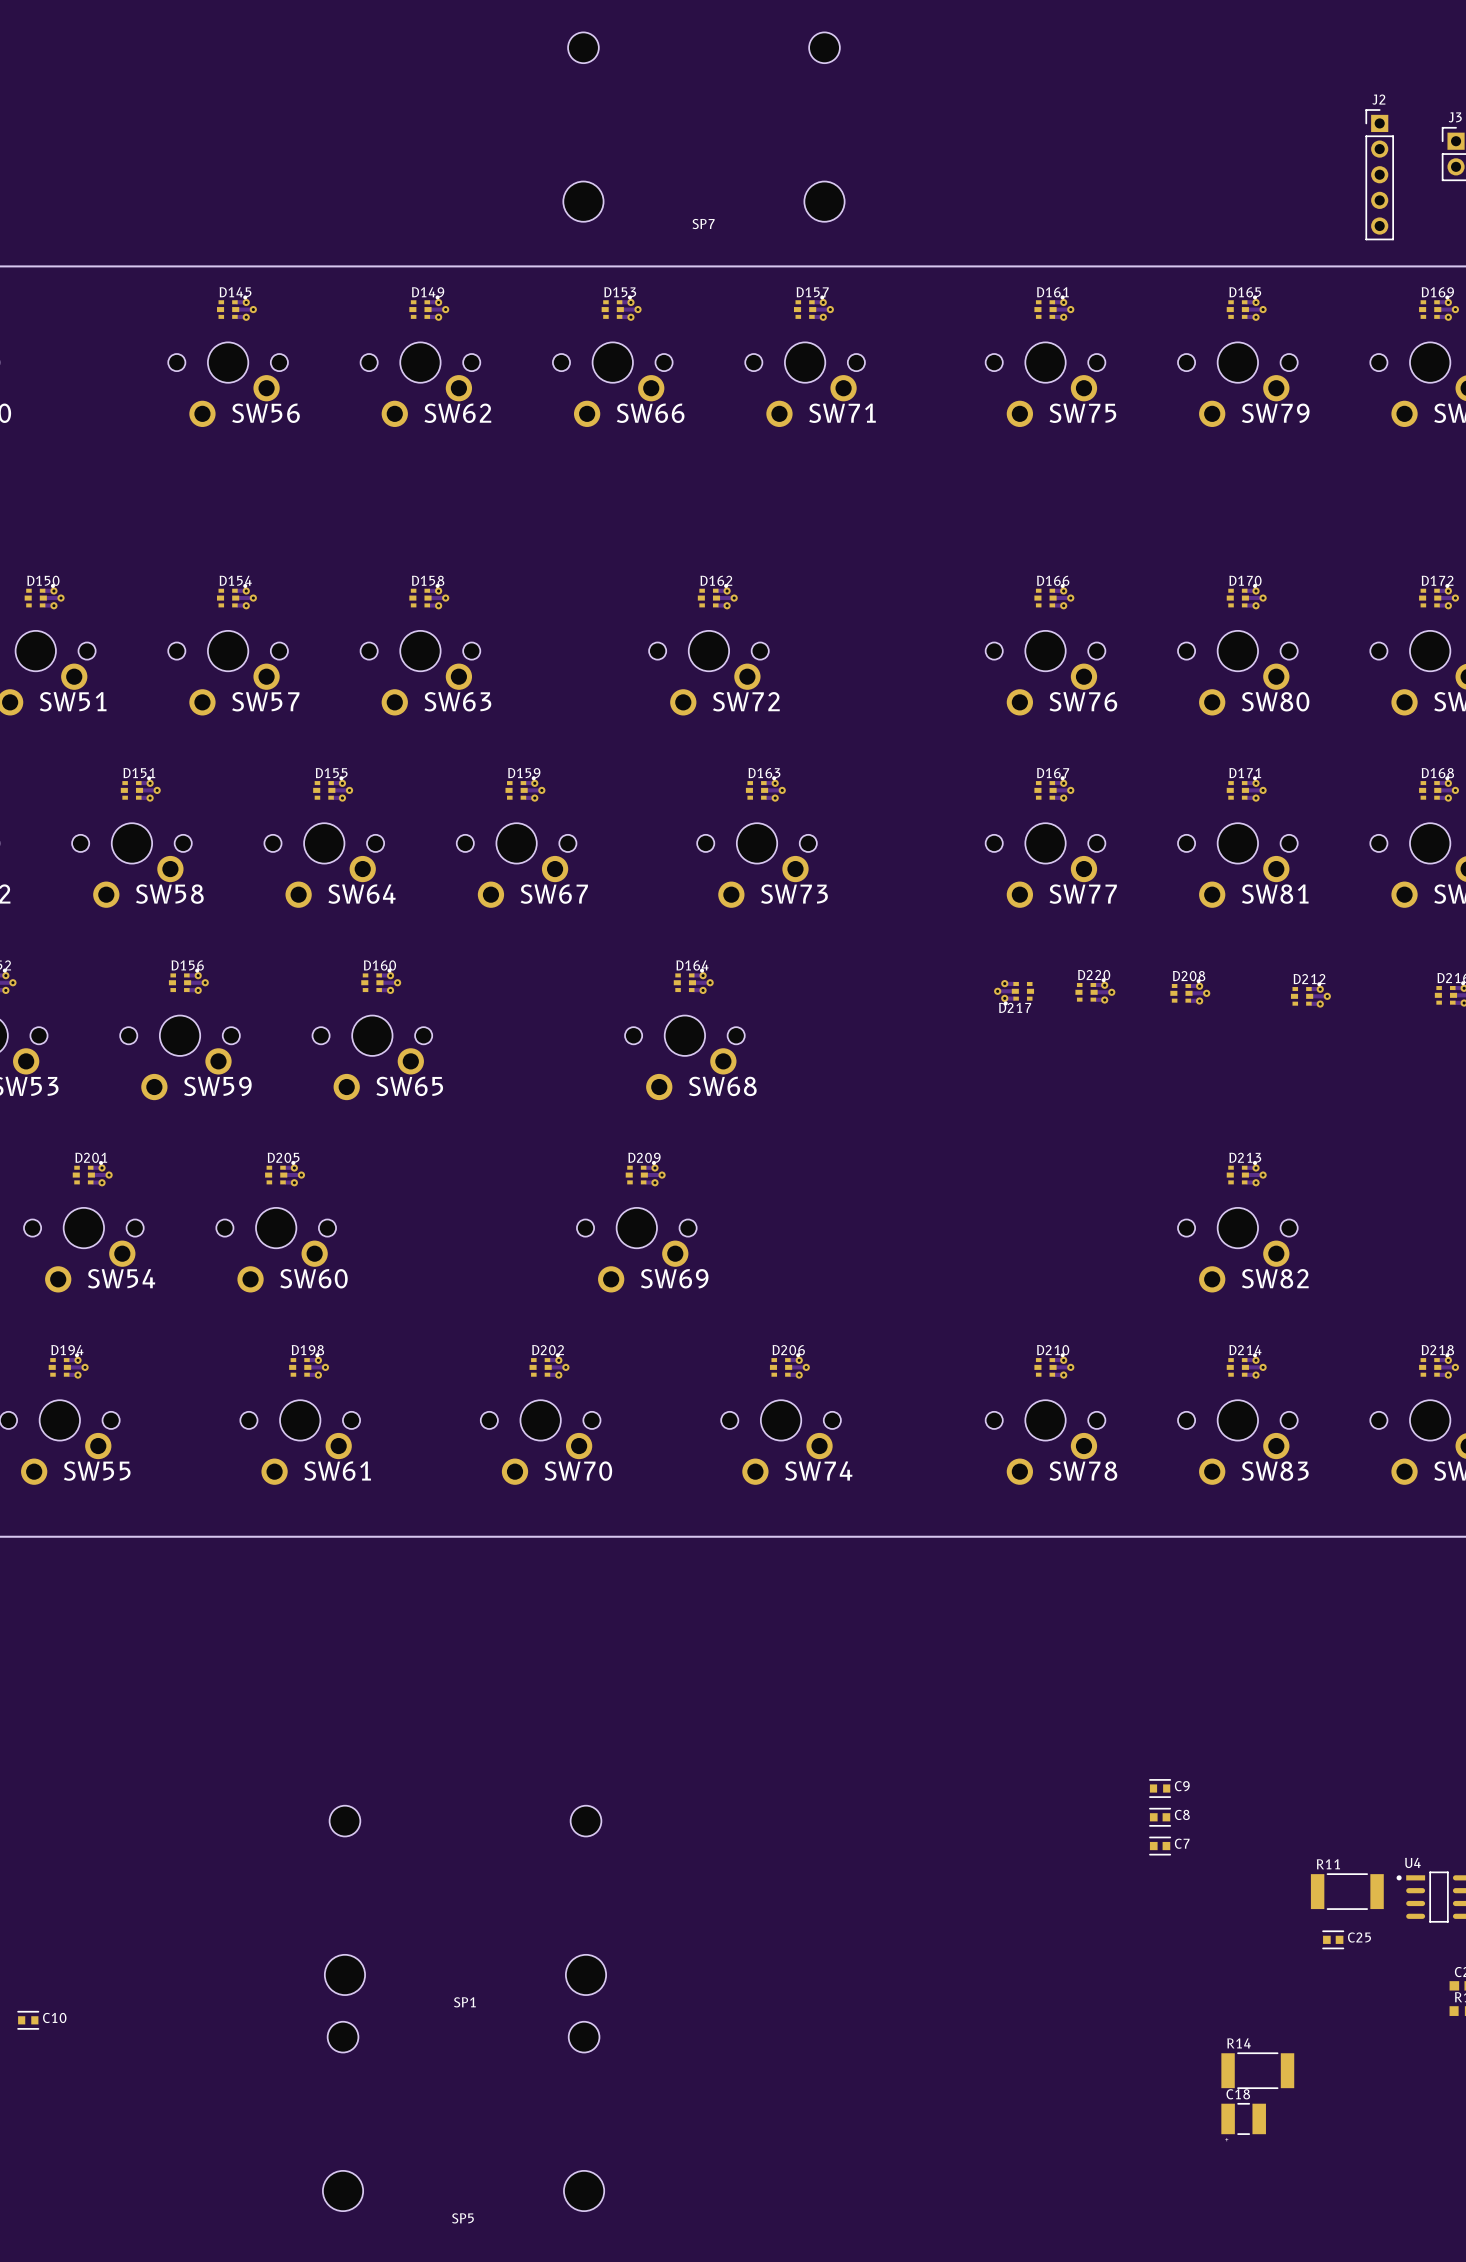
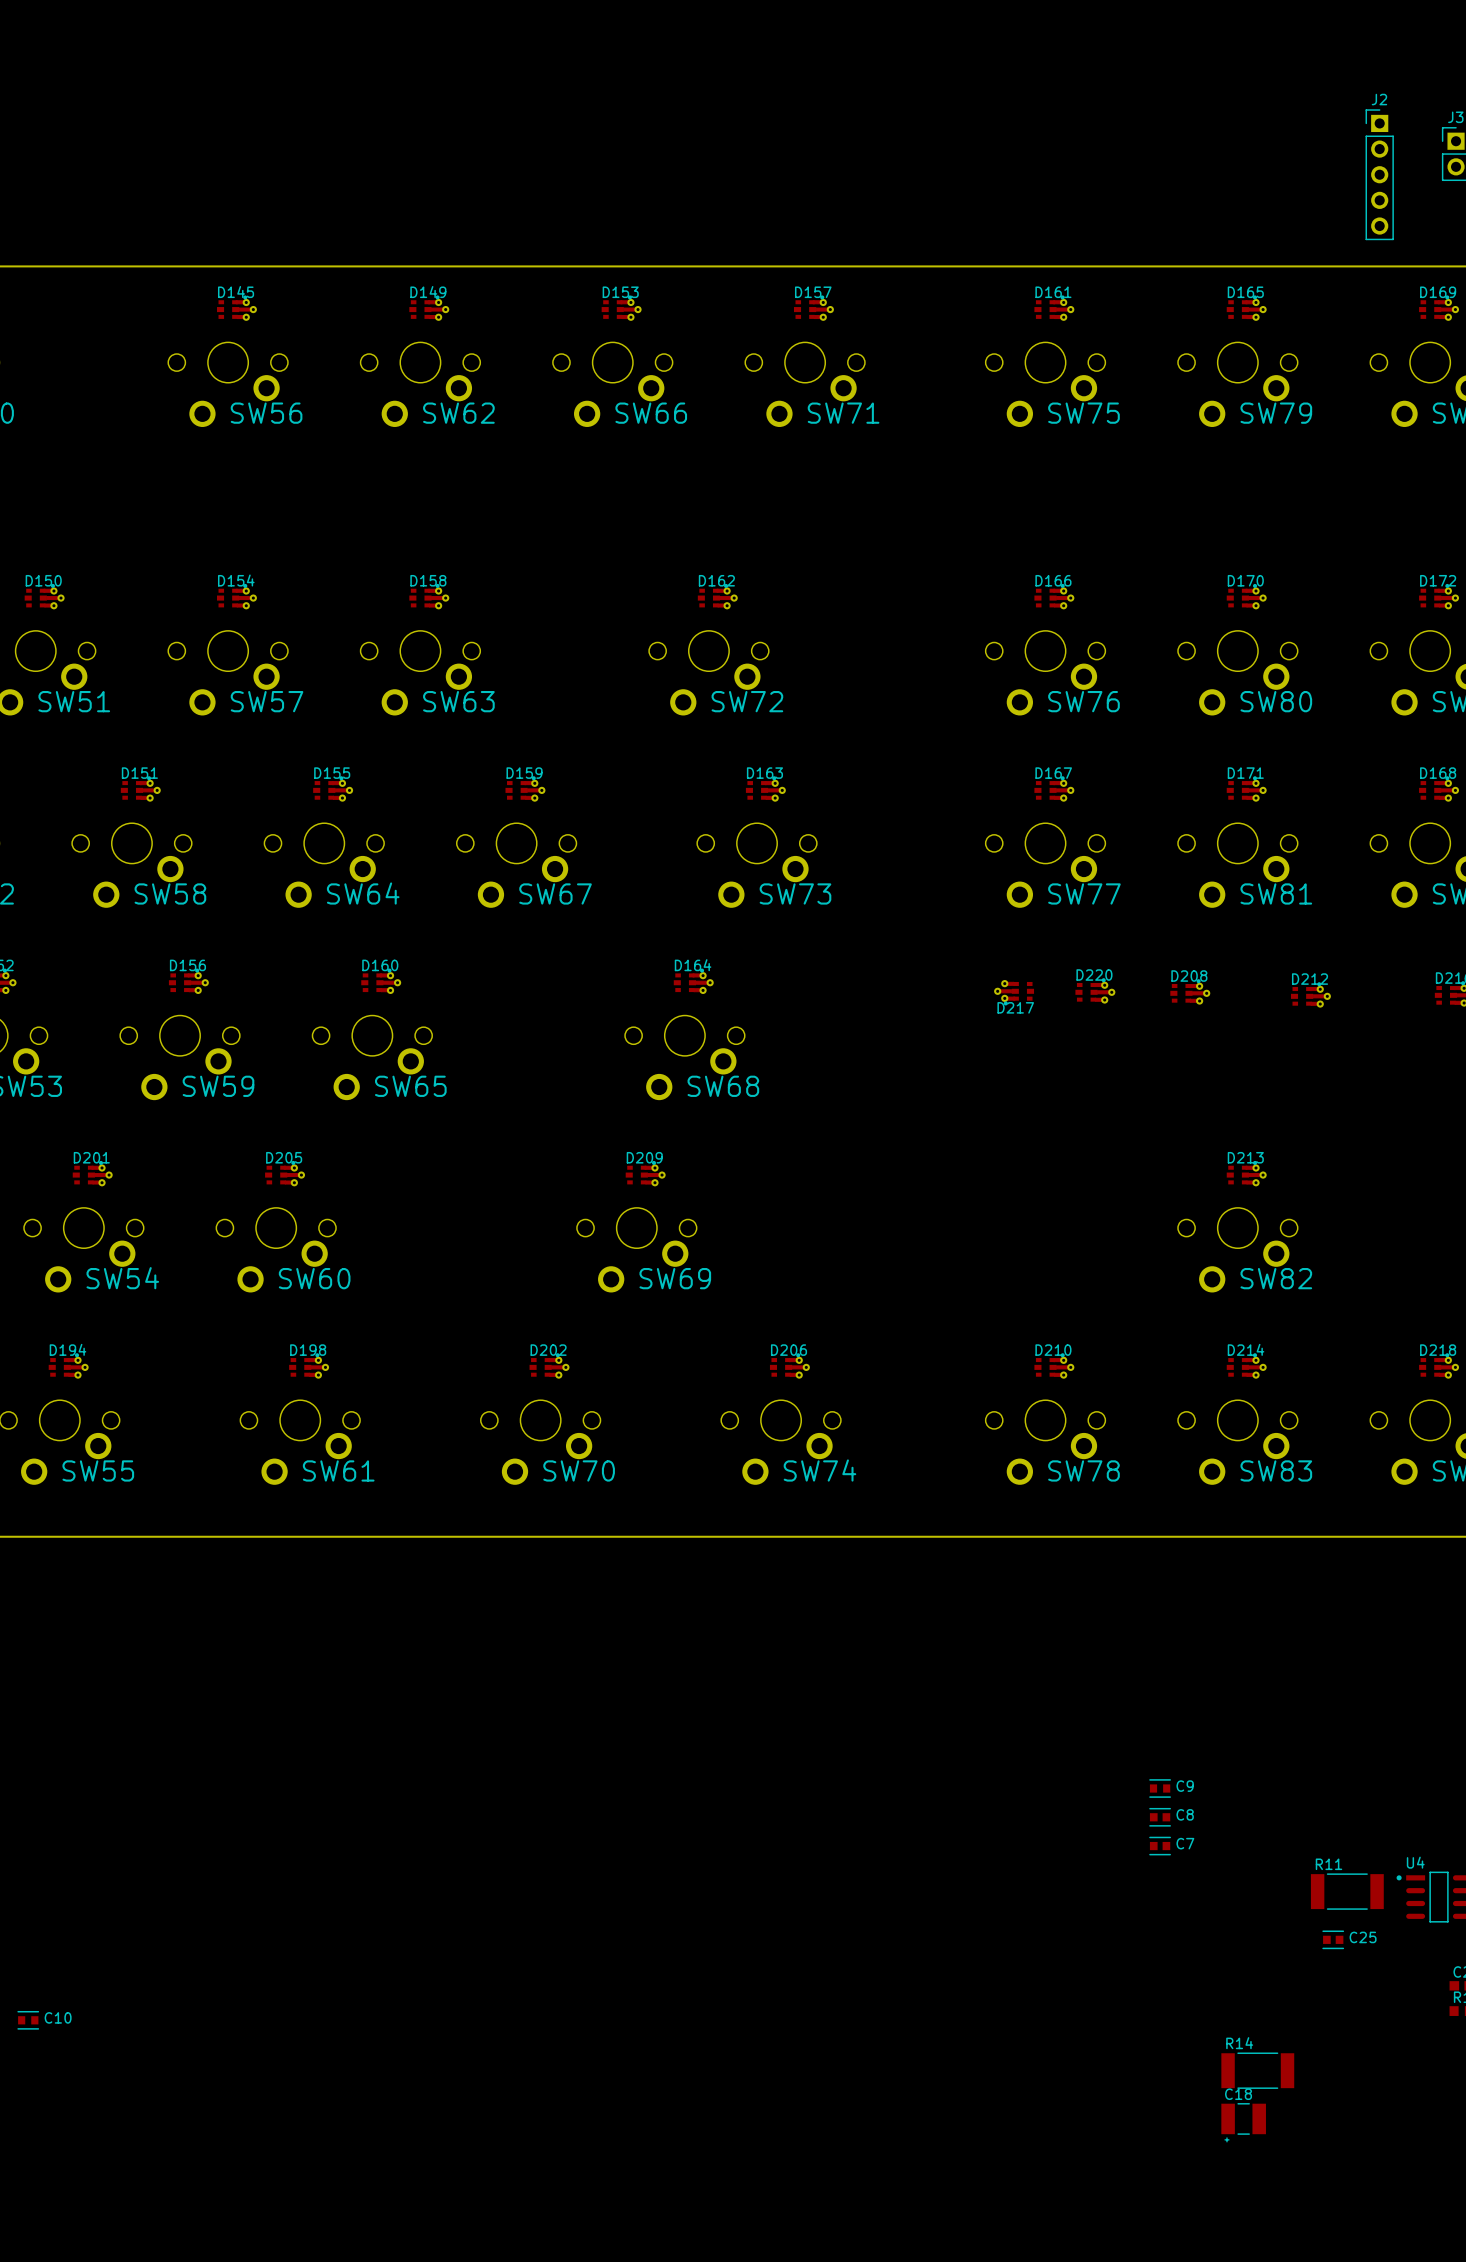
SP7: (703, 127) -> none
SP1: (465, 1900) -> none
SP5: (463, 2116) -> none

